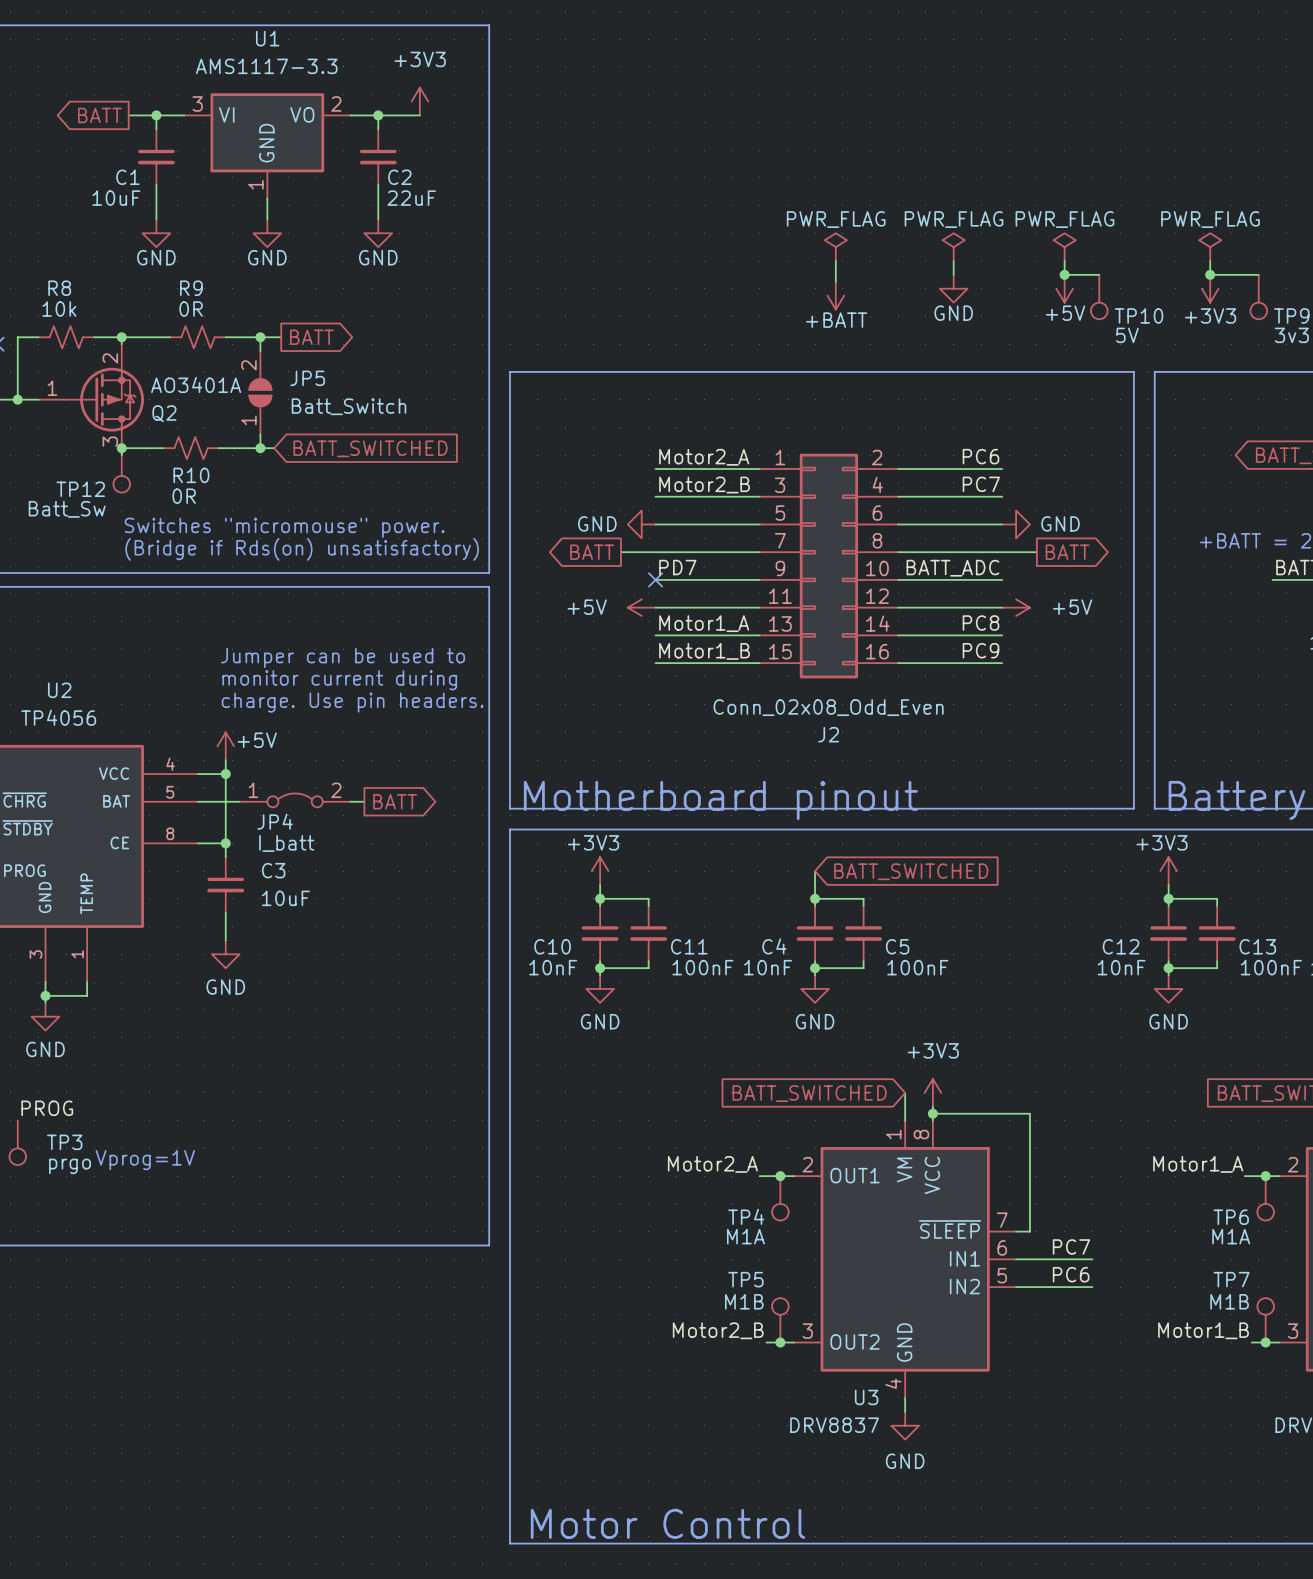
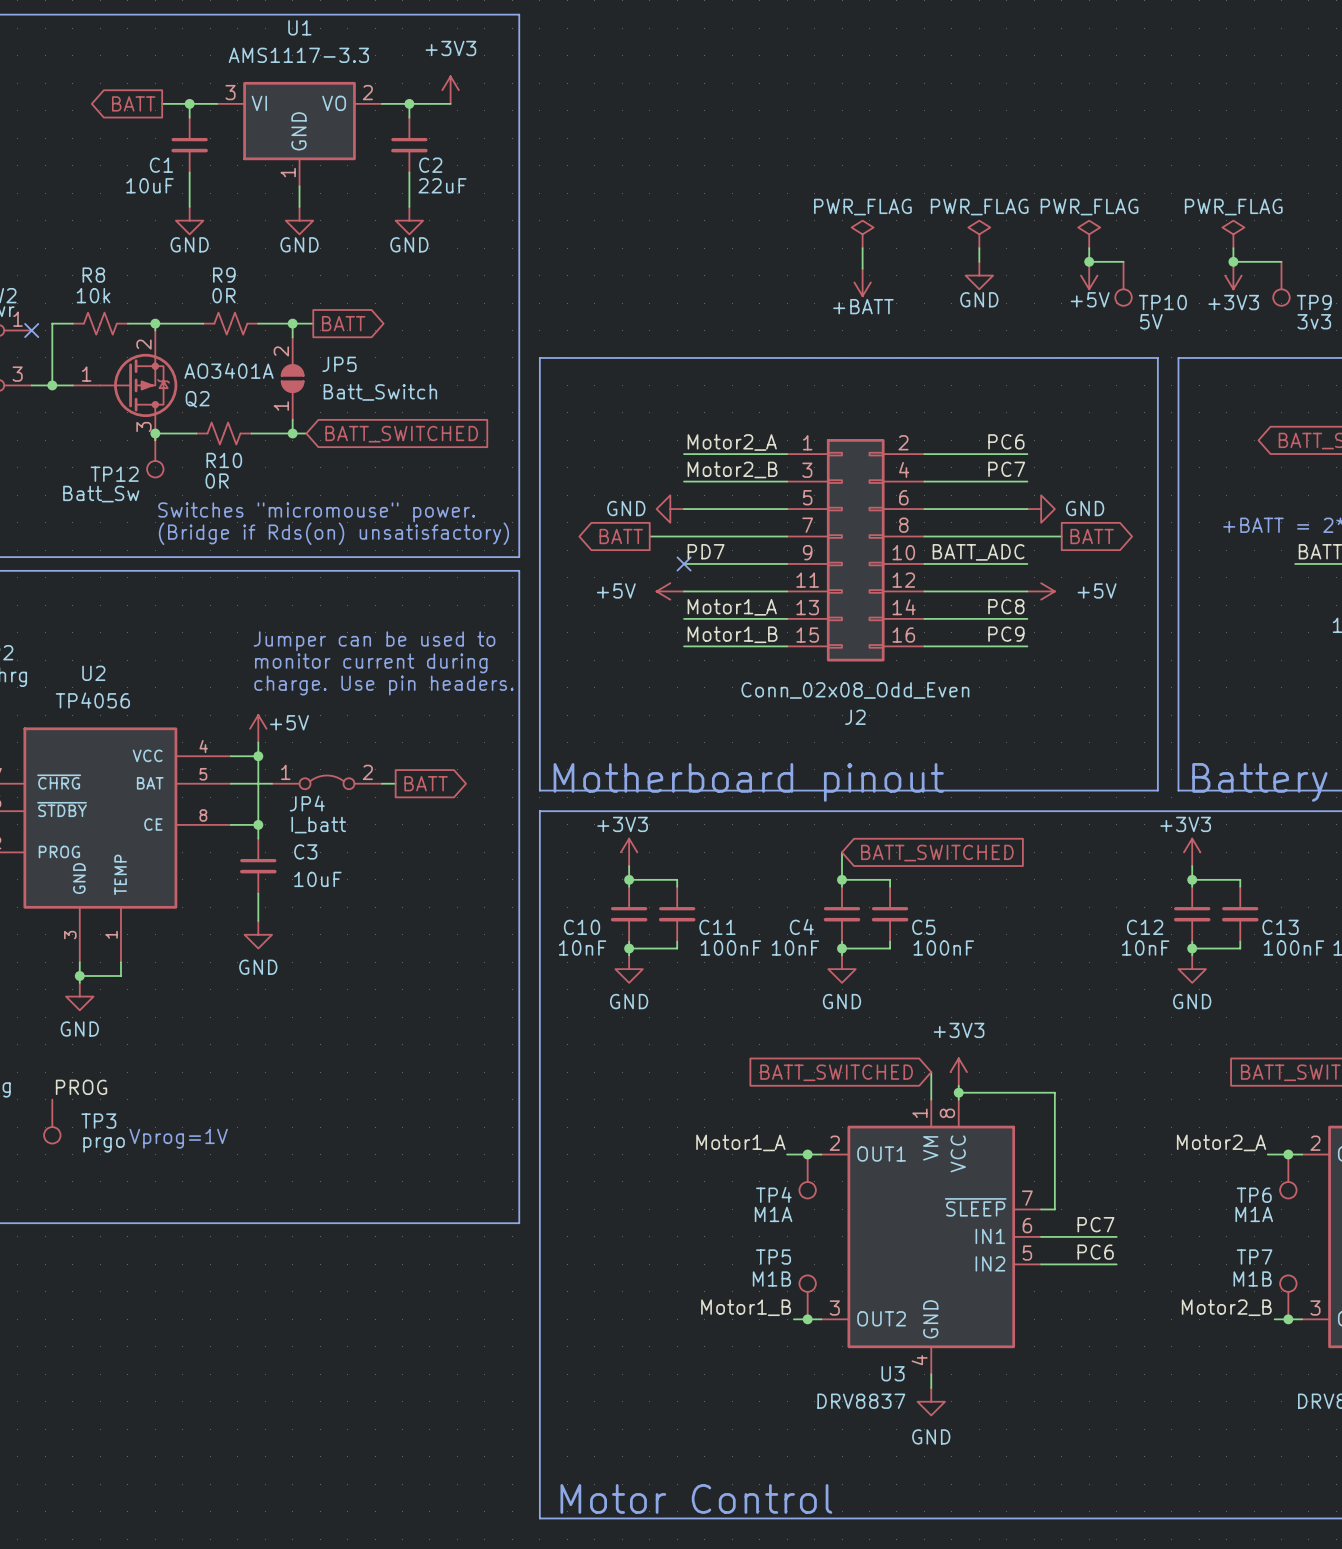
label: Motor2_A (712, 1164) -> Motor1_A (740, 1142)
label: Motor1_A (1198, 1164) -> Motor2_A (1221, 1142)
label: Motor2_B (718, 1330) -> Motor1_B (746, 1307)
label: Motor1_B (1203, 1330) -> Motor2_B (1226, 1307)

